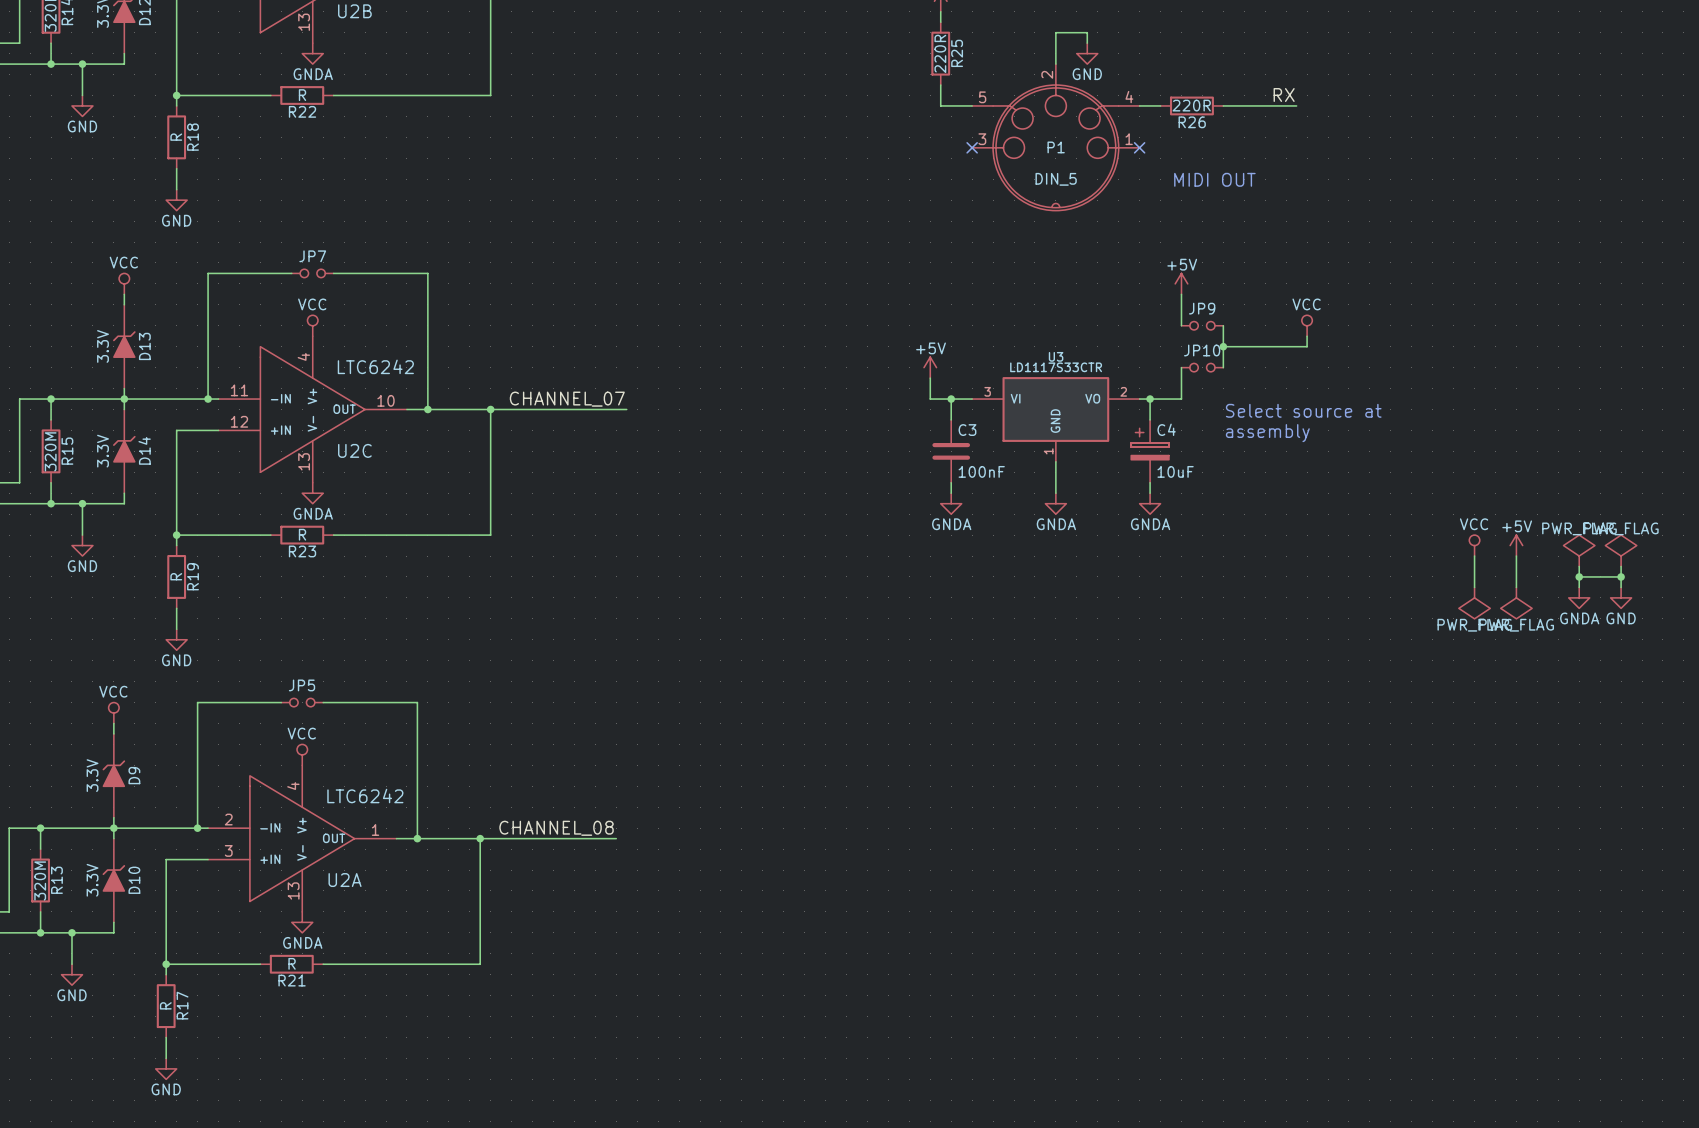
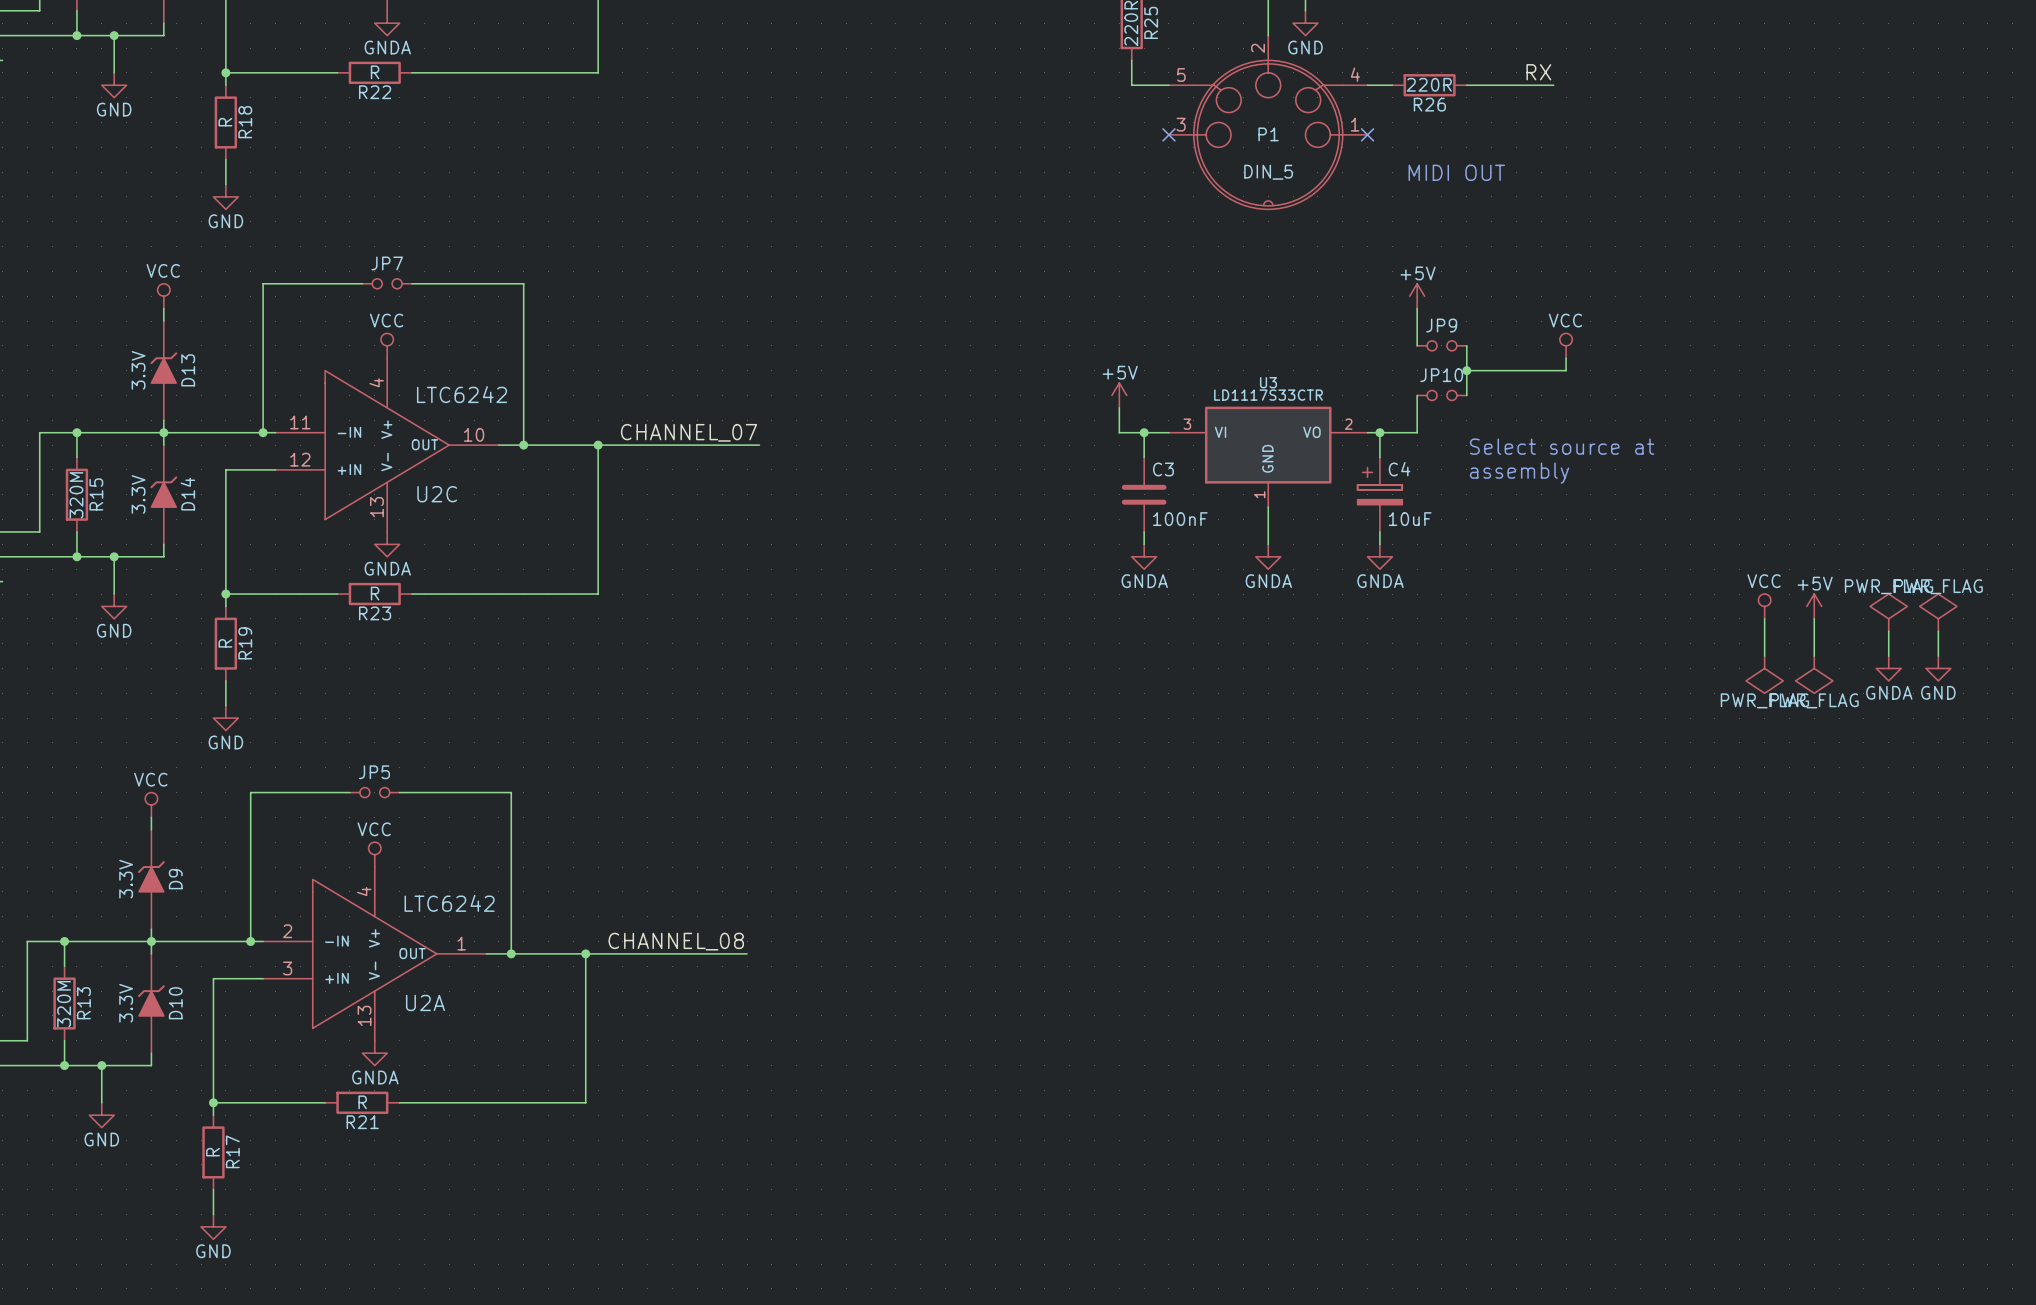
wire: (1579, 576) (1621, 576) -> none
junction: (1579, 576) -> none
junction: (1621, 576) -> none

